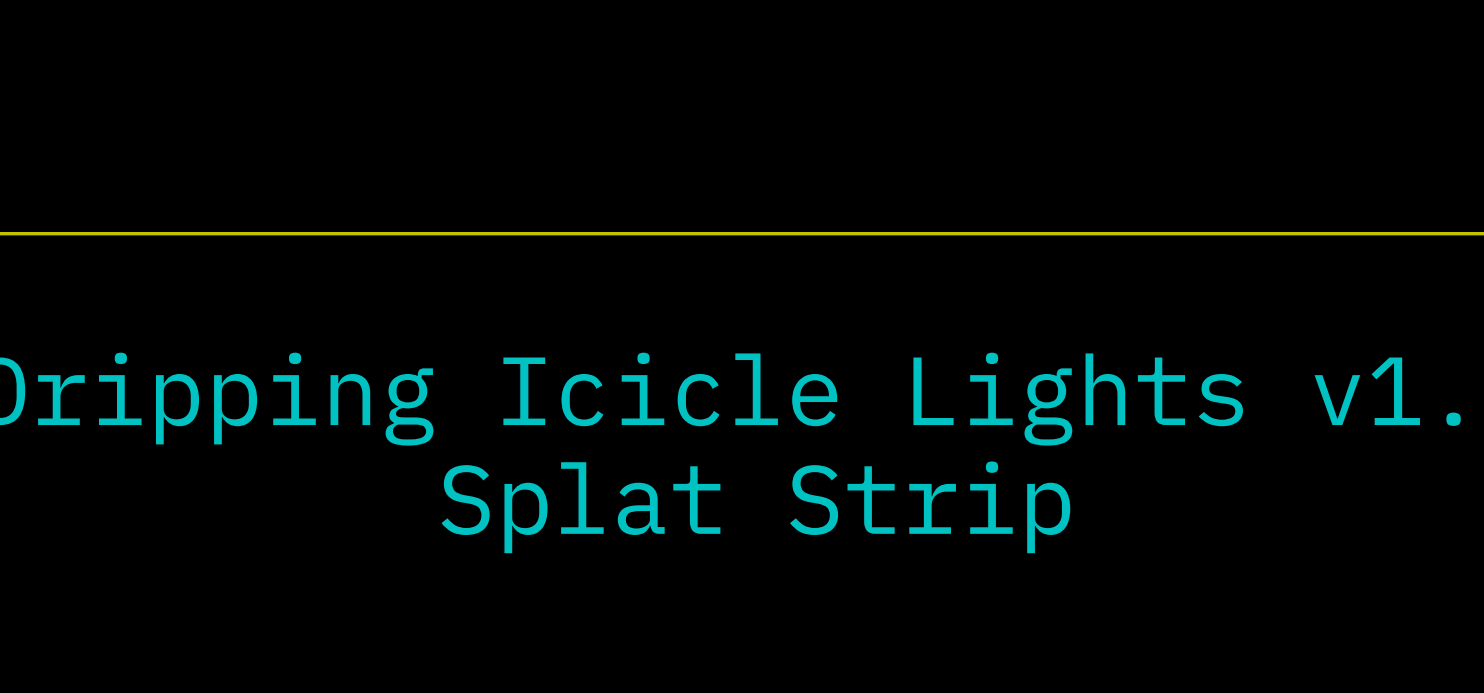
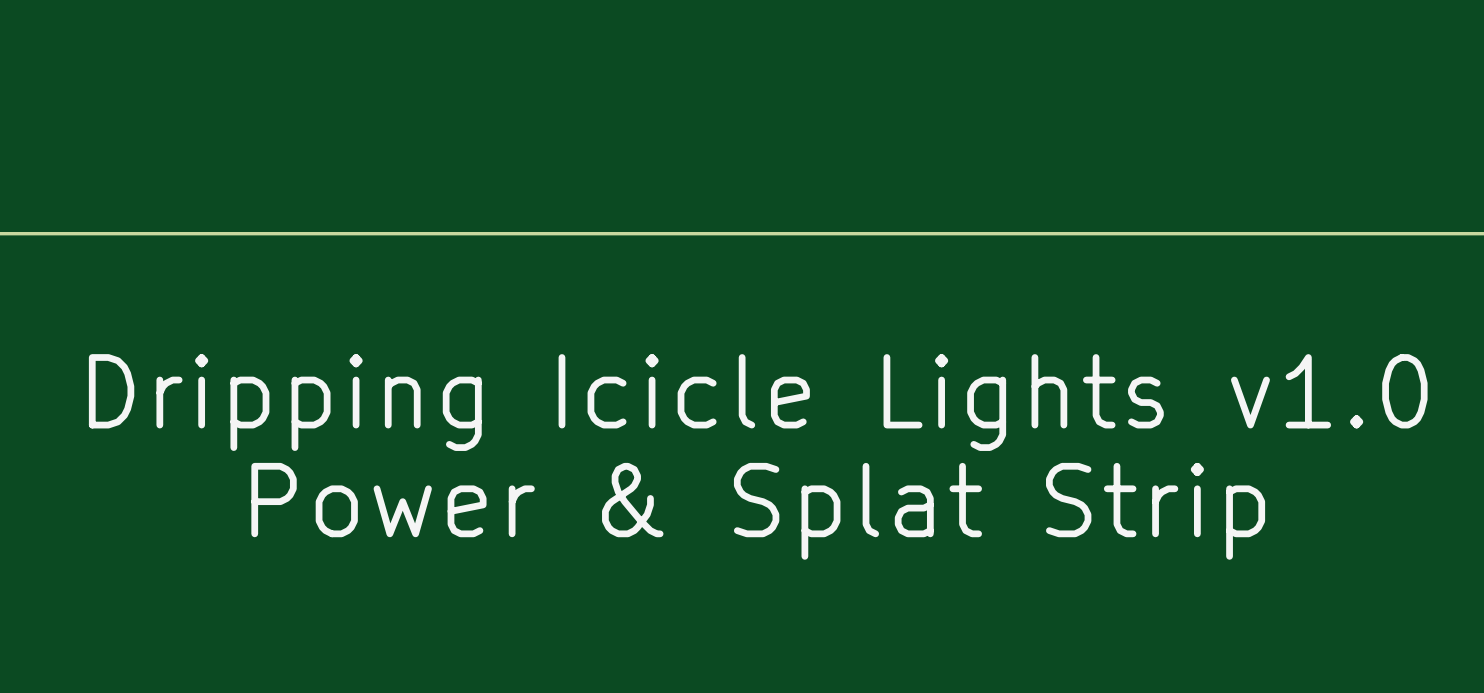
text: Splat Strip (755, 507) -> Power & Splat Strip (758, 511)

